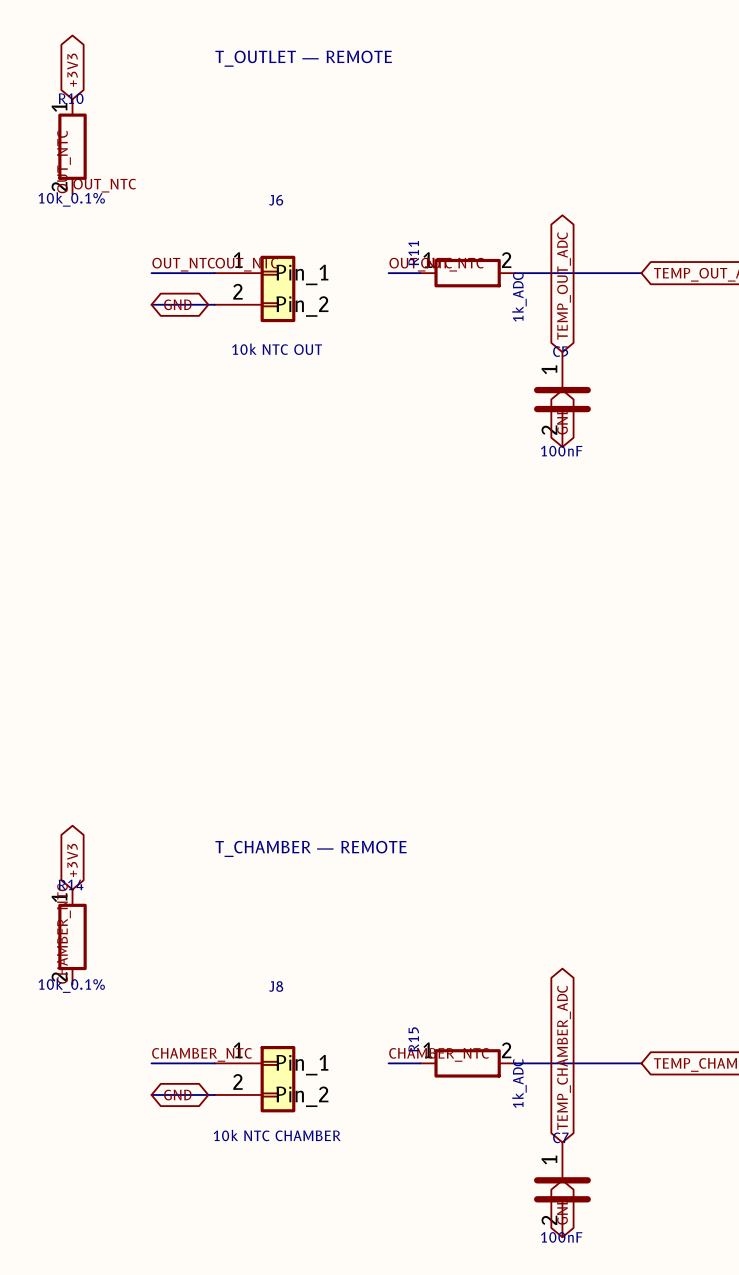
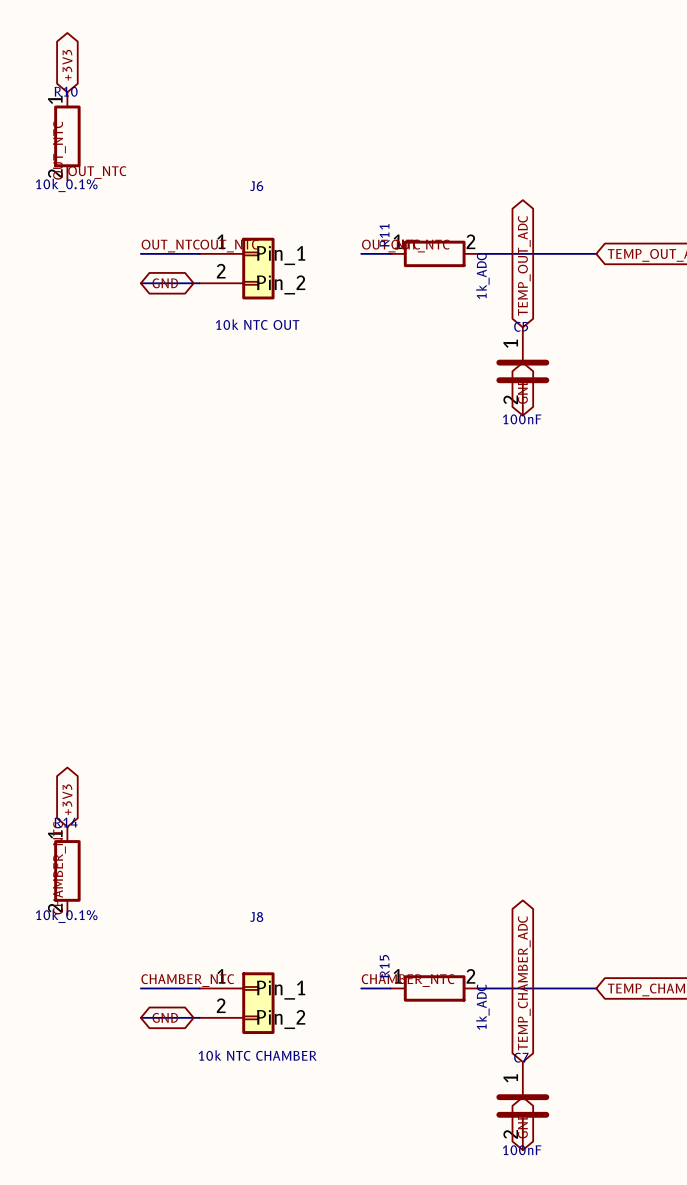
text: T_OUTLET — REMOTE (303, 58) -> none
text: T_CHAMBER — REMOTE (311, 848) -> none

